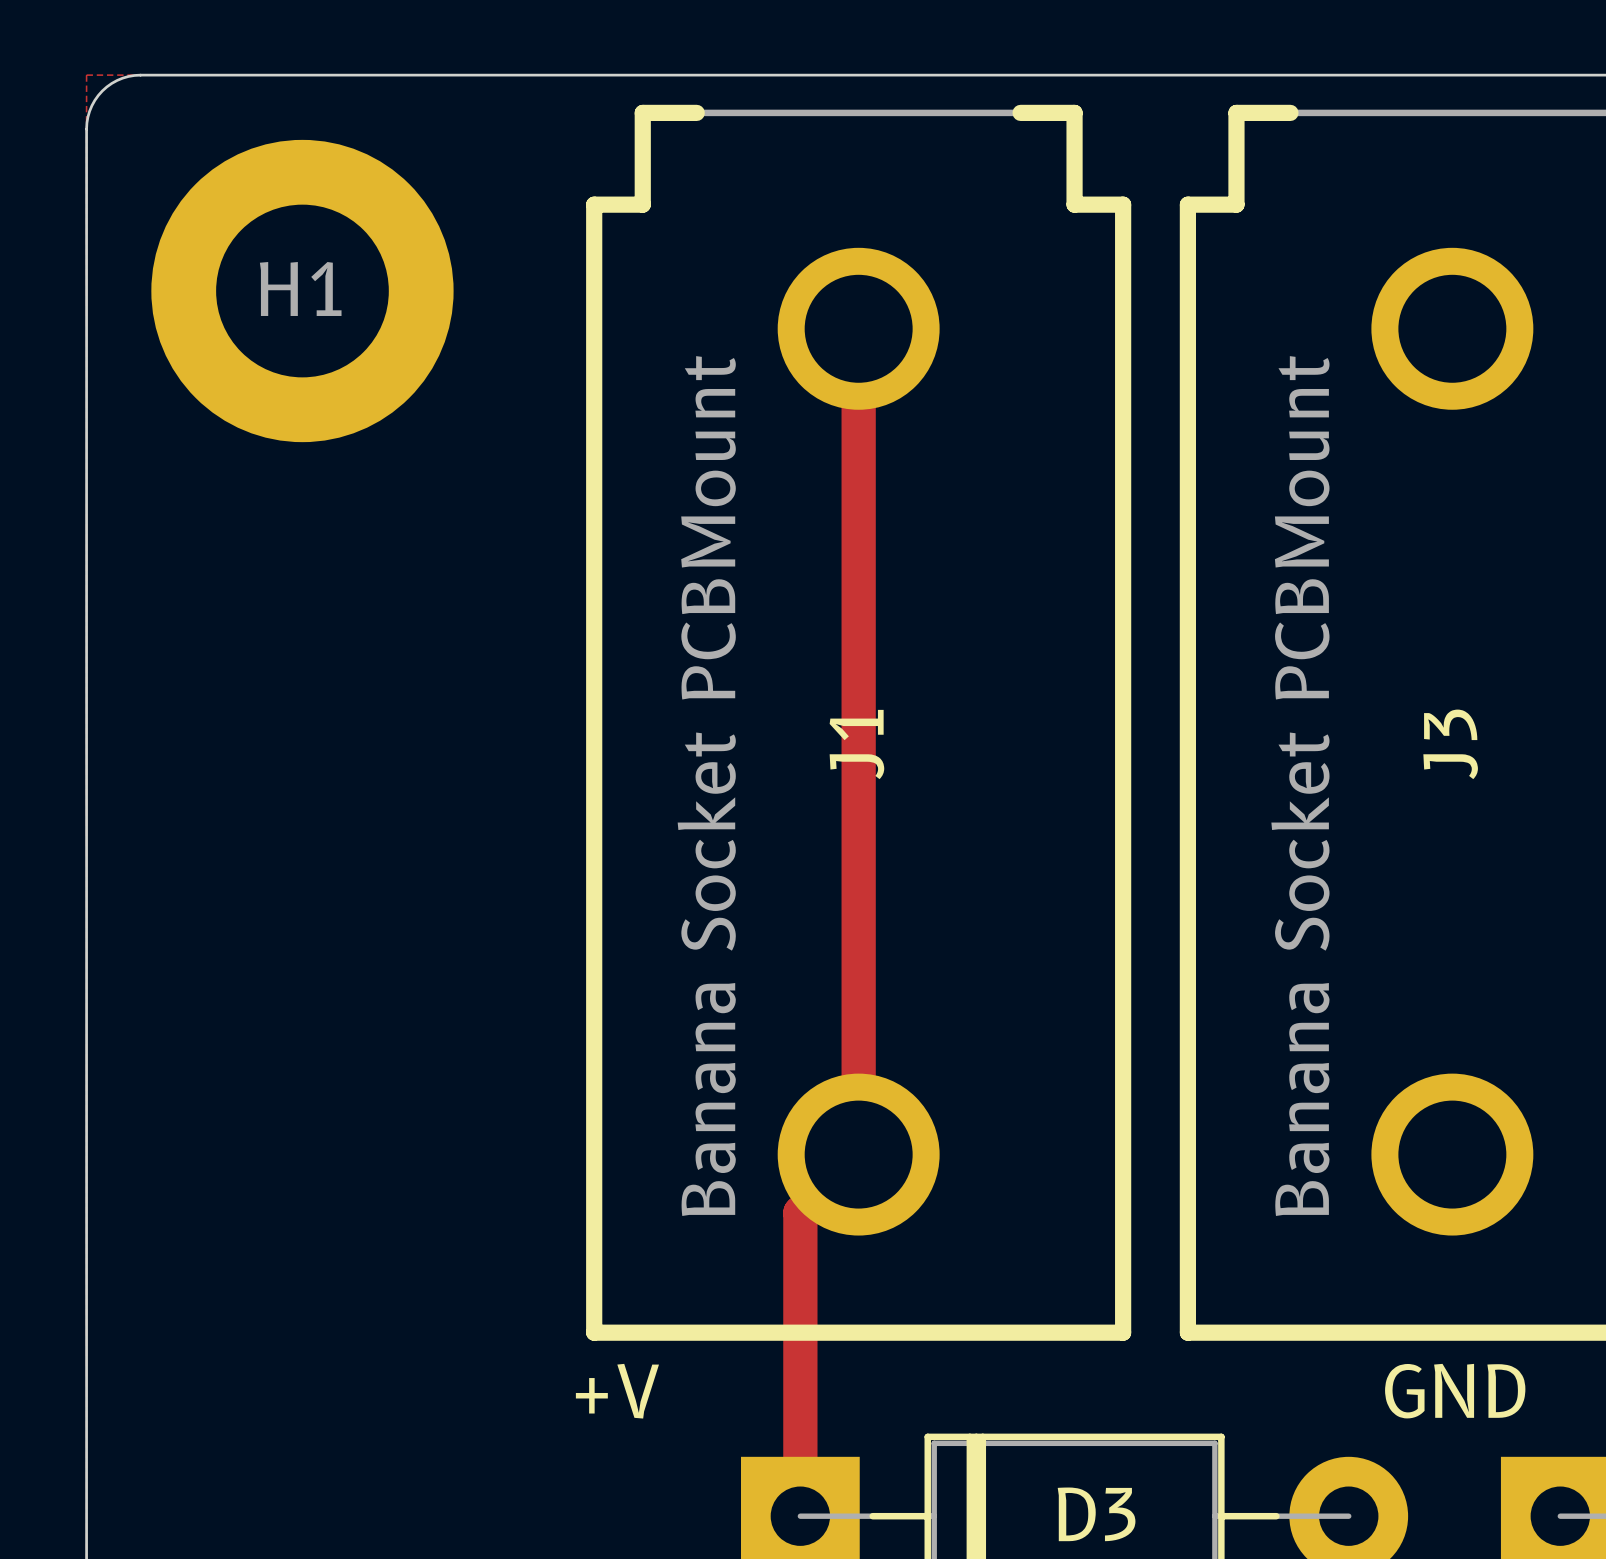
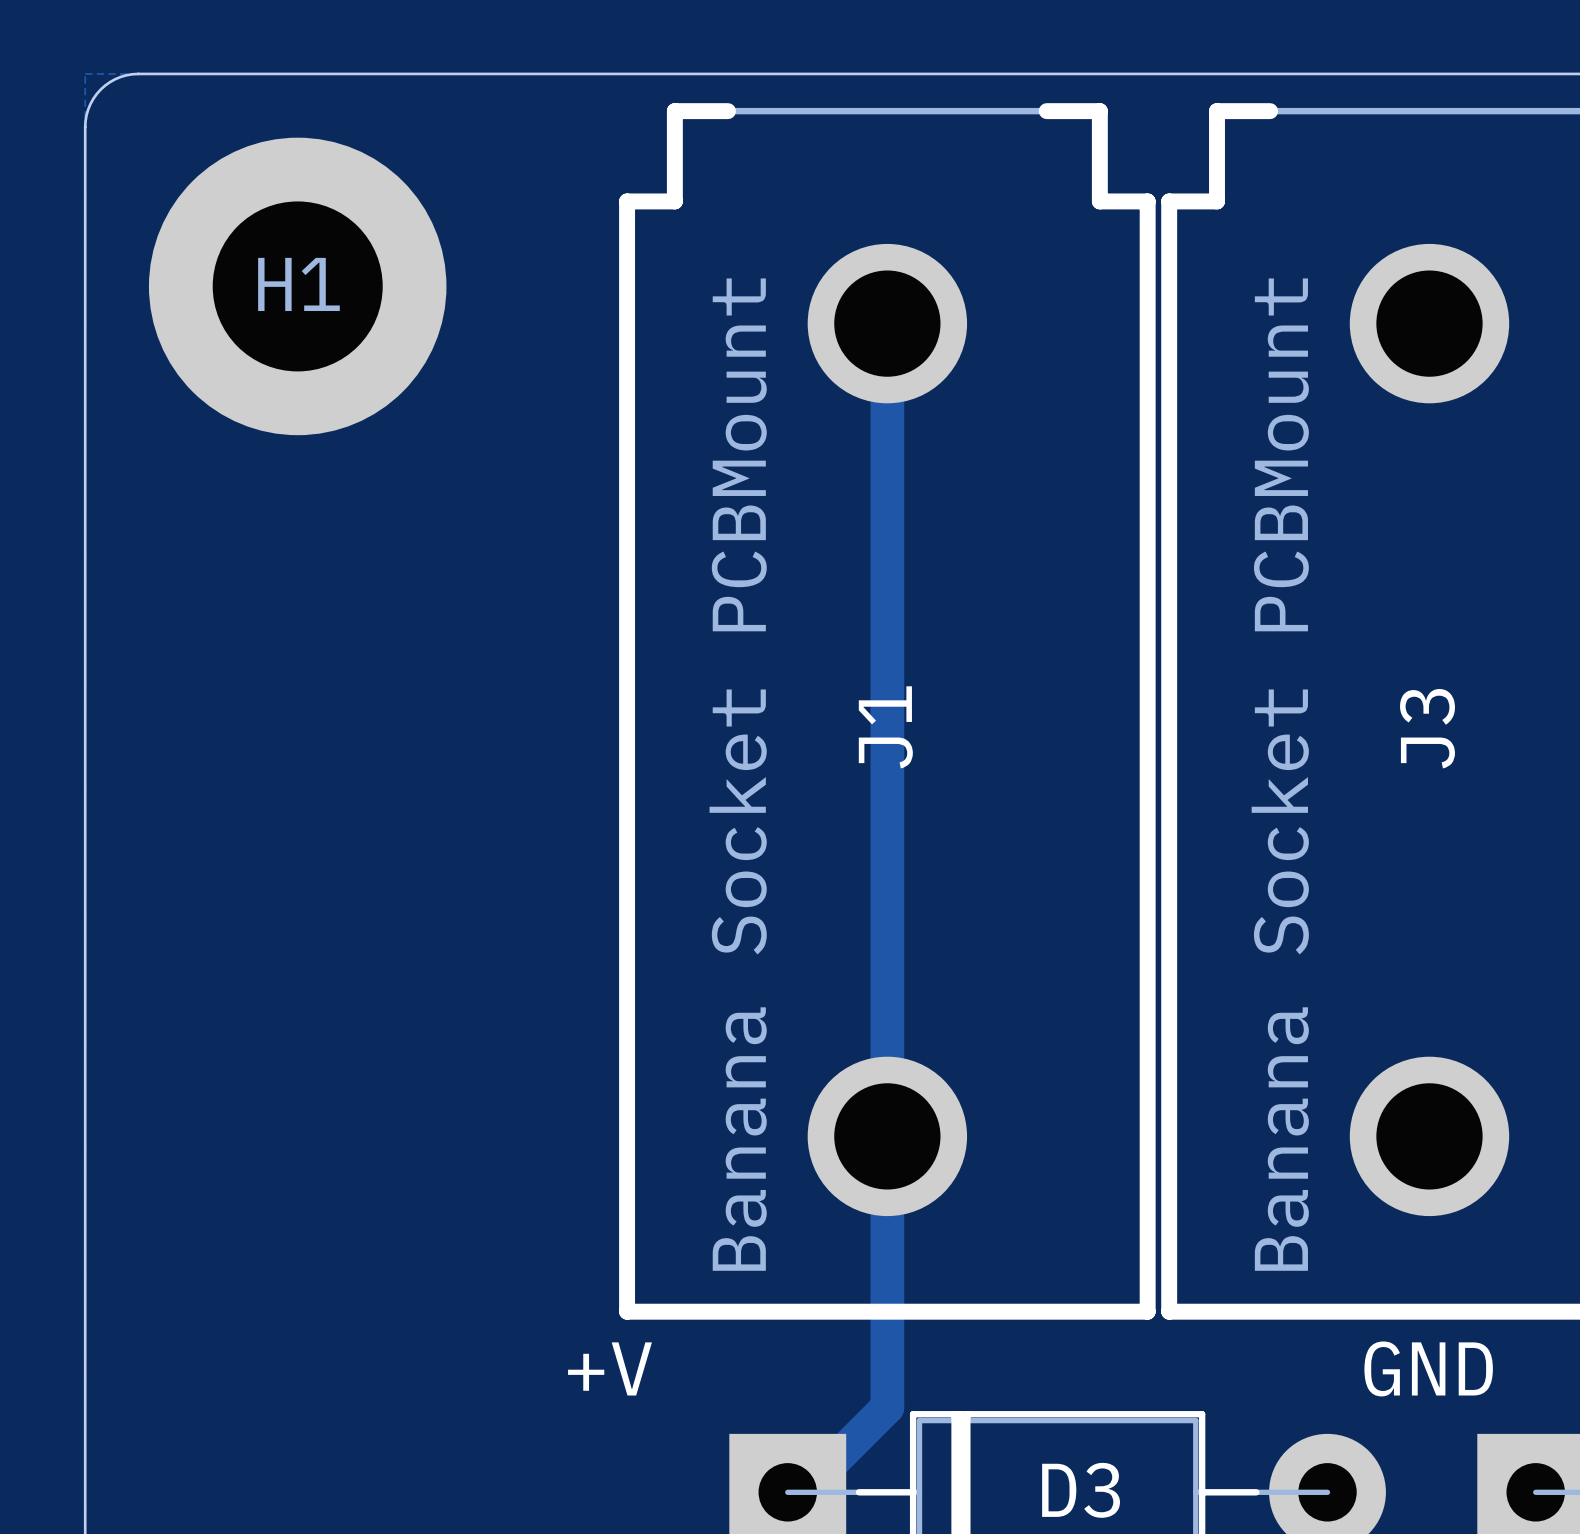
track: (858, 328) (858, 1154) (800, 1212) (800, 1516) -> (887, 323) (887, 1407) (802, 1492) (787, 1492)
J1 position: (858, 722) -> (887, 711)

